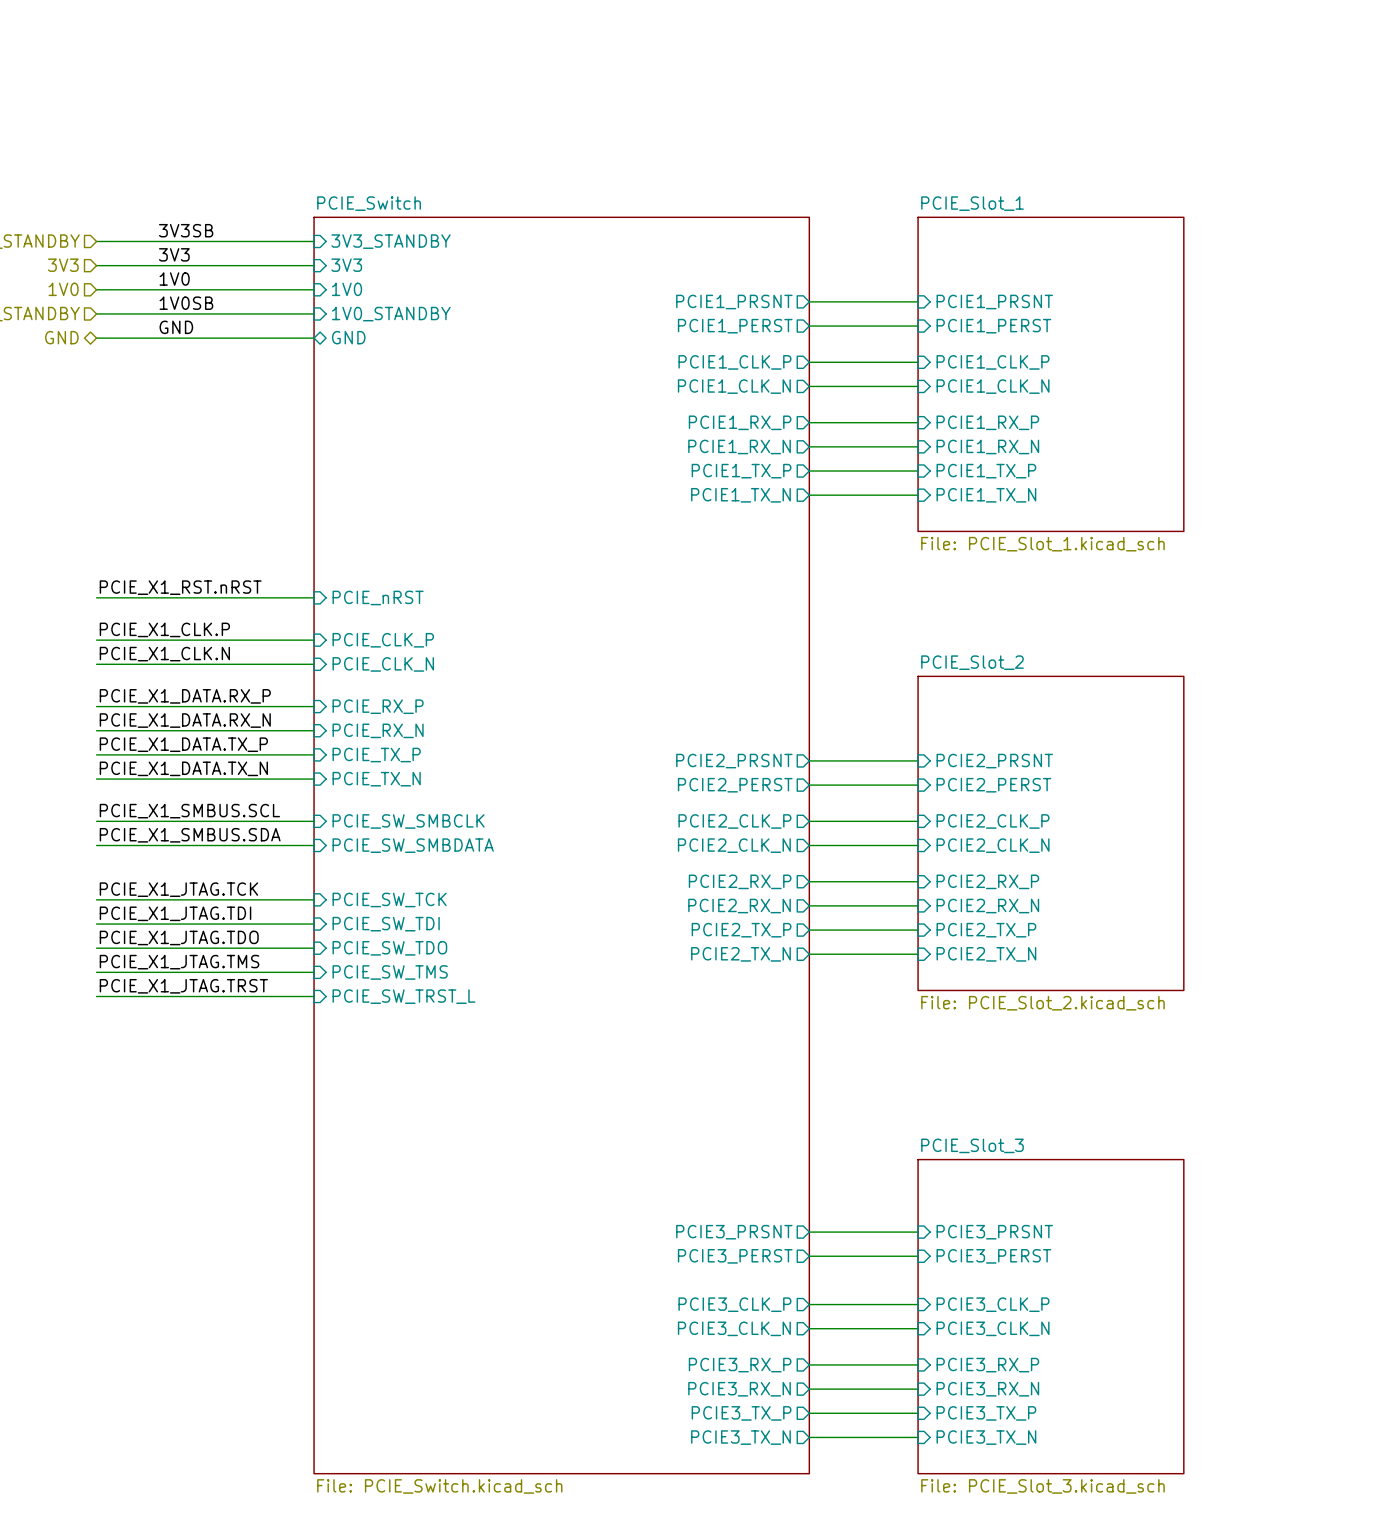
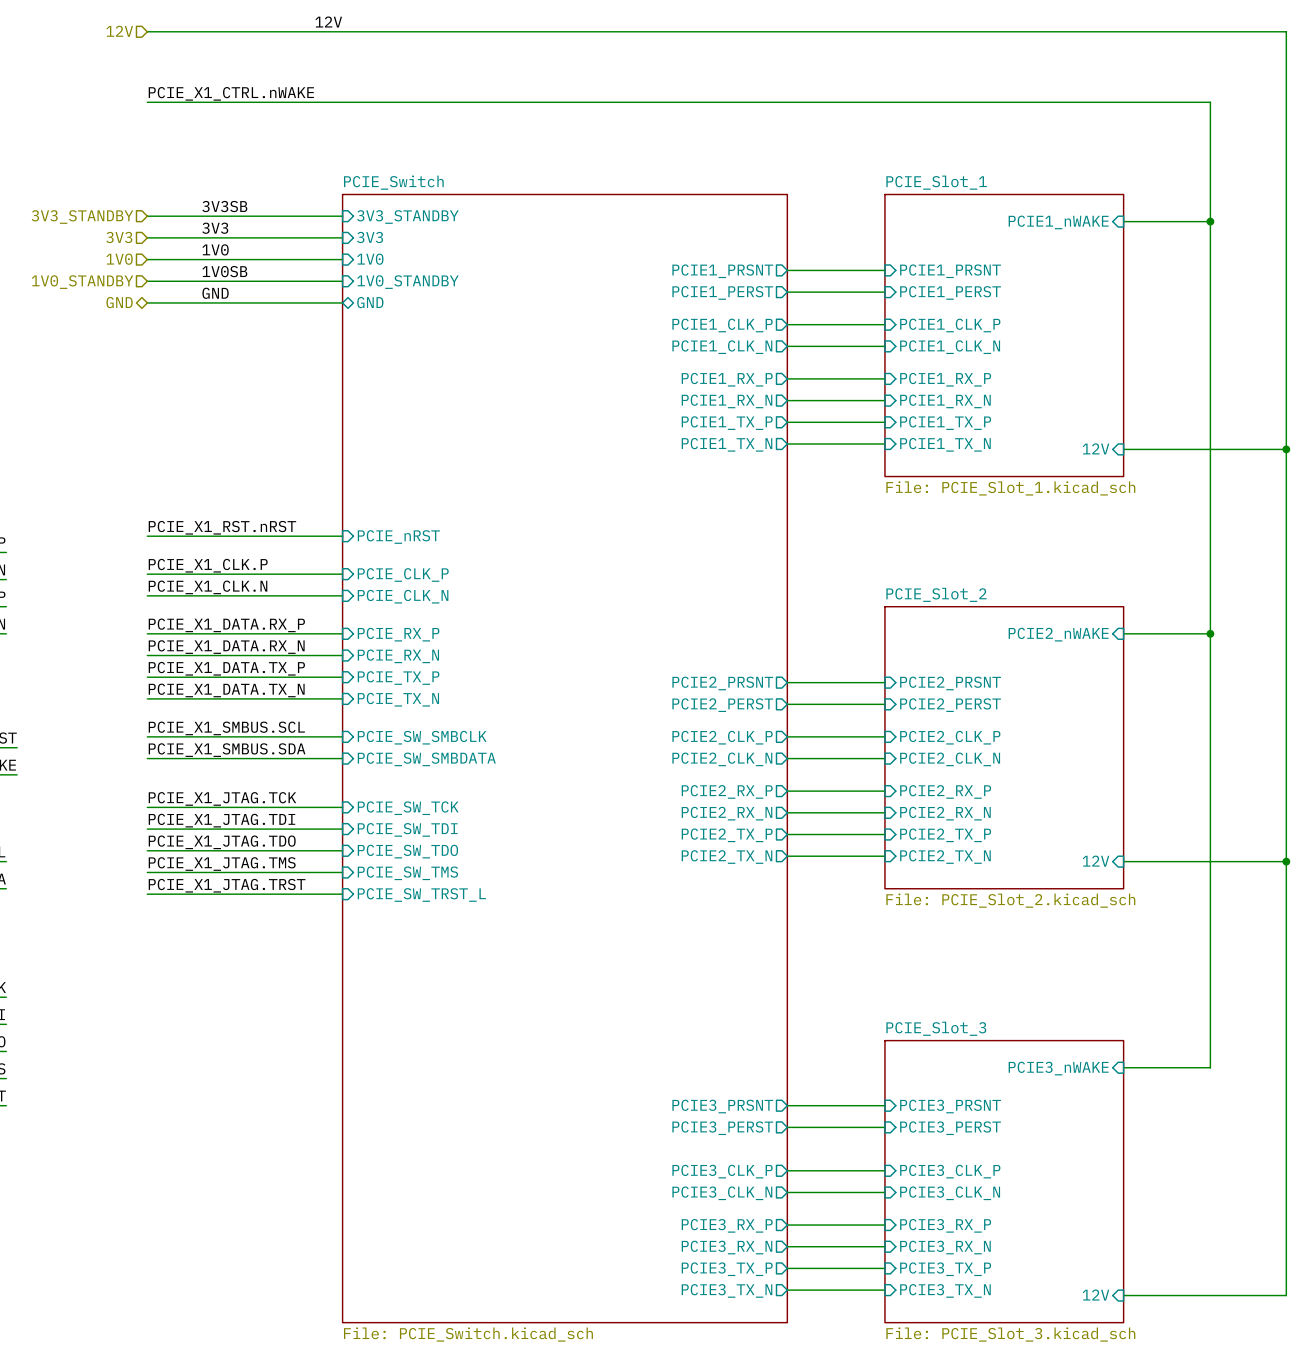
label: none -> 12V (328, 22)
hierarchical label: none -> 12V (119, 31)
wire: none -> (147, 31) (1286, 31) (1286, 1295) (1123, 1295)
label: none -> PCIE_X1_CTRL.nWAKE (231, 93)
wire: none -> (147, 102) (1210, 102) (1210, 1067) (1123, 1067)
sheet pin: none -> PCIE1_nWAKE (1058, 222)
wire: none -> (1123, 221) (1210, 221)
junction: none -> (1210, 221)
sheet pin: none -> 12V (1095, 448)
wire: none -> (1123, 449) (1286, 449)
junction: none -> (1286, 449)
sheet pin: none -> PCIE2_nWAKE (1058, 634)
wire: none -> (1123, 633) (1210, 633)
junction: none -> (1210, 633)
sheet pin: none -> 12V (1095, 861)
wire: none -> (1123, 861) (1286, 861)
junction: none -> (1286, 861)
sheet pin: none -> PCIE3_nWAKE (1058, 1068)
sheet pin: none -> 12V (1095, 1295)

